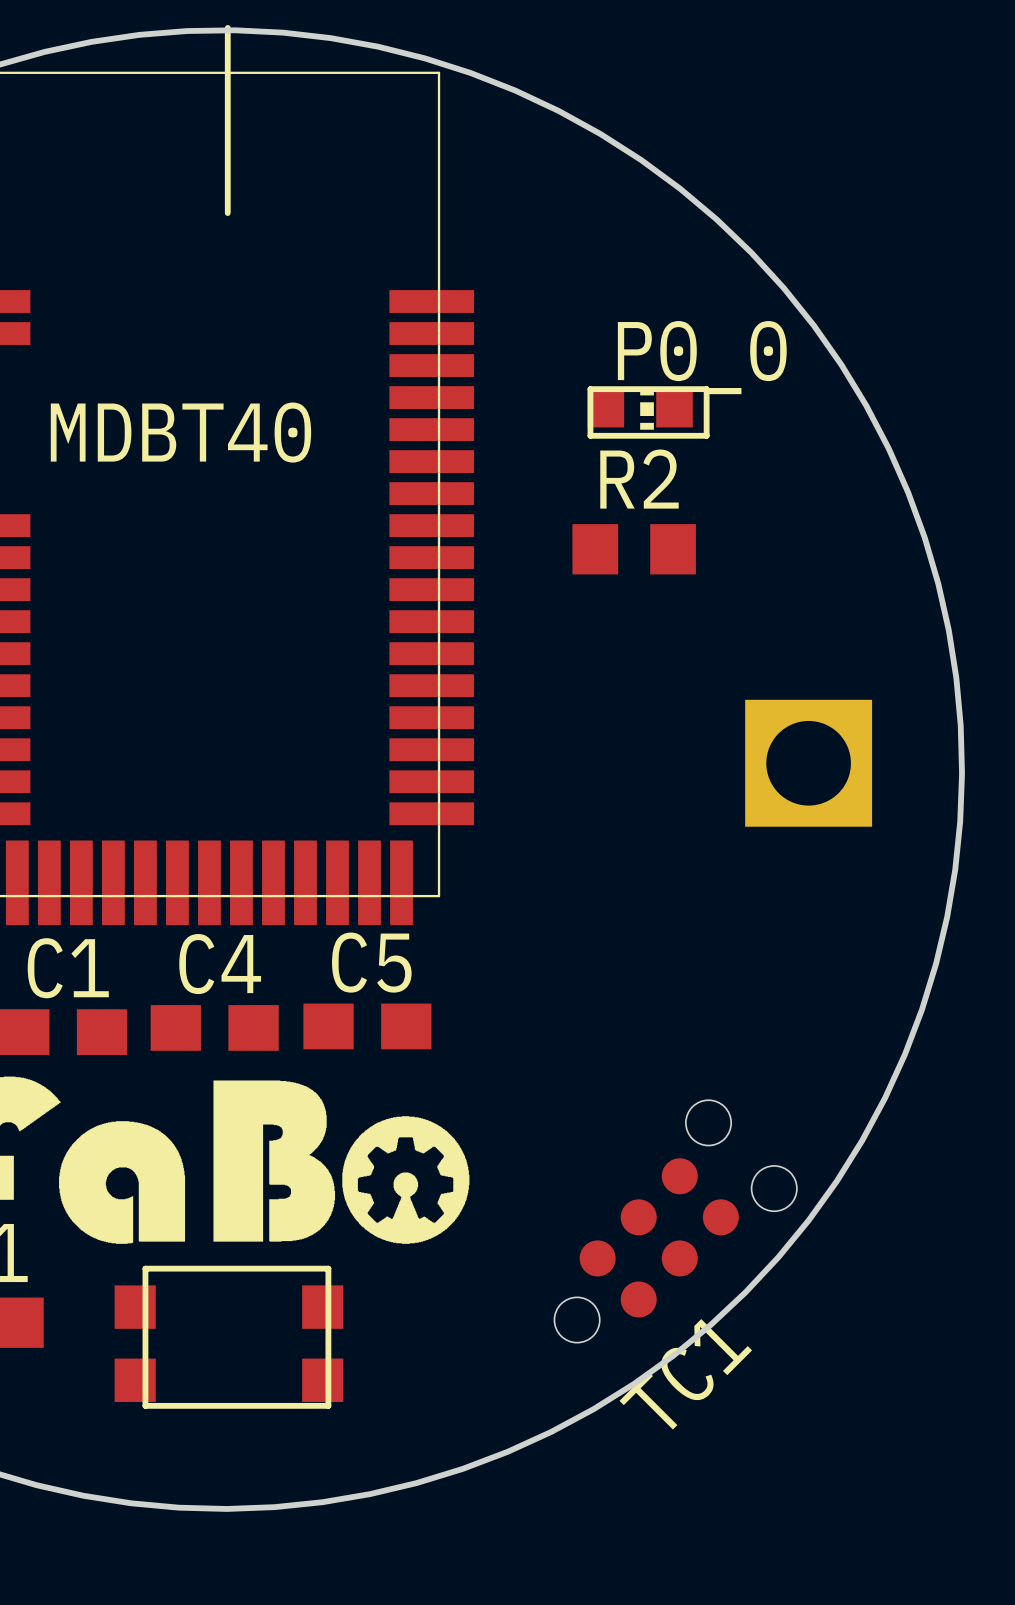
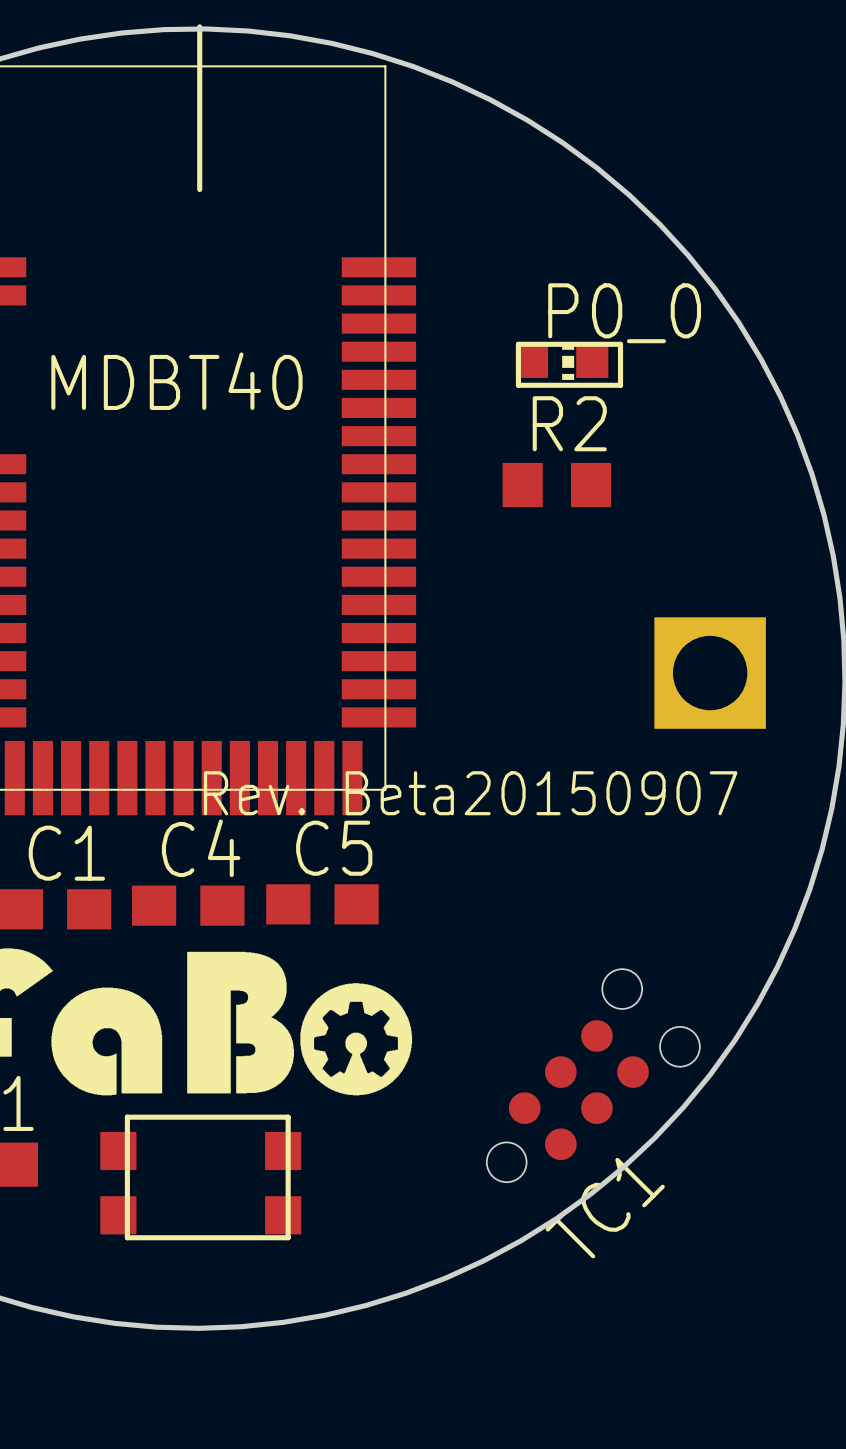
text: none -> Rev. Beta20150907 (470, 793)

